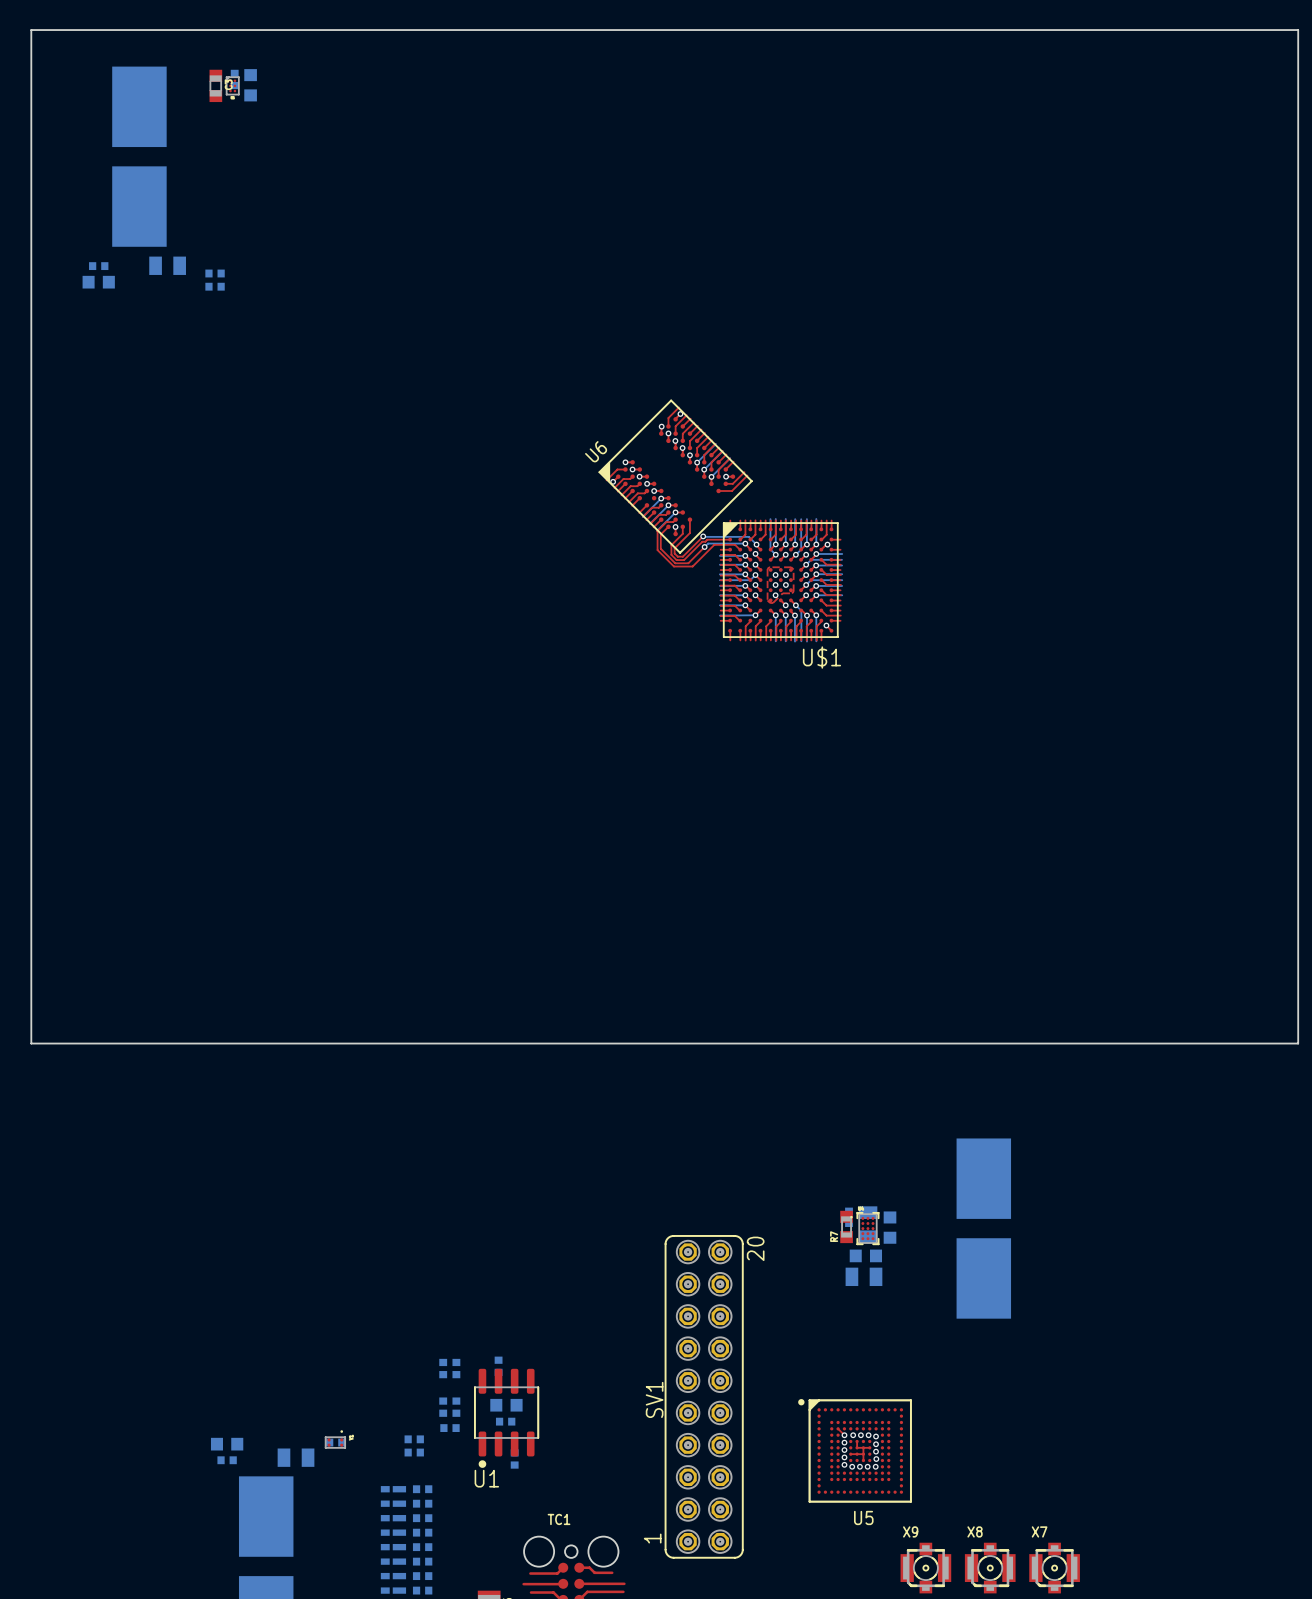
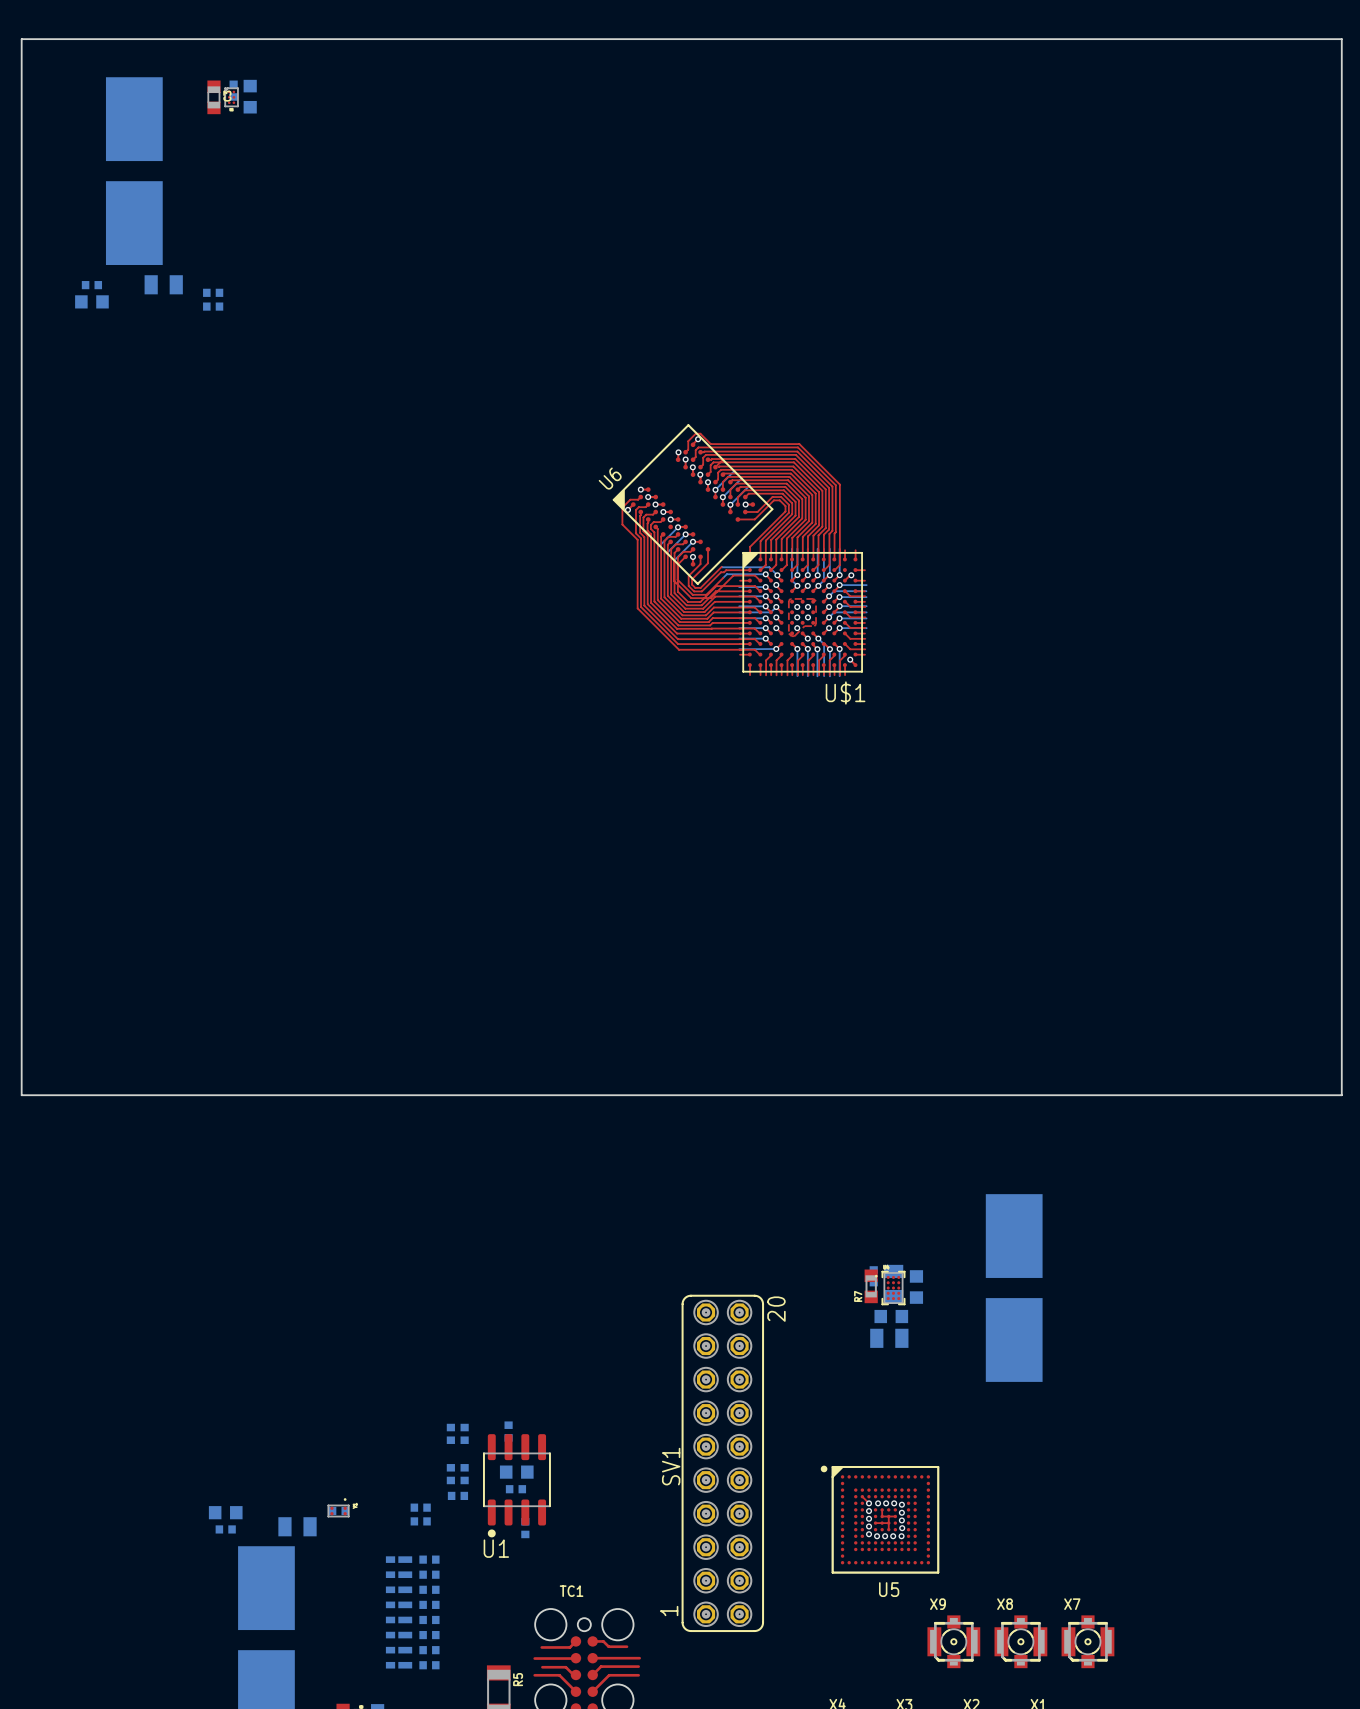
top track: (678, 407) (668, 418) (668, 426) -> (839, 550) (839, 484) (799, 444) (710, 444) (700, 433) (695, 433) (688, 441) (688, 449) (685, 452)
top track: (686, 415) (675, 426) (675, 433) -> (834, 550) (835, 485) (797, 447) (698, 447) (693, 459)
top track: (690, 418) (682, 426) -> (829, 550) (829, 533) (832, 530) (832, 486) (797, 451) (700, 452)
top track: (693, 422) (682, 433) (682, 440) -> (823, 550) (823, 534) (829, 529) (829, 488) (795, 454) (706, 454) (700, 467)
top track: (697, 425) (689, 433) -> (818, 550) (818, 535) (825, 528) (825, 489) (795, 459) (708, 459)
top track: (701, 429) (689, 441) (689, 448) -> (813, 550) (813, 535) (822, 526) (822, 490) (793, 462) (713, 462) (708, 474)
top track: (708, 436) (697, 448) (697, 455) -> (802, 550) (802, 536) (815, 523) (815, 493) (791, 469) (720, 469) (715, 482)
top track: none -> (718, 467) (793, 466) (819, 492) (819, 525) (807, 536) (807, 549)
top track: (711, 440) (705, 446) -> (797, 549) (797, 537) (812, 522) (812, 494) (790, 473) (724, 473)
top track: (715, 443) (709, 450) -> (792, 550) (792, 537) (808, 521) (808, 496) (789, 476) (727, 476)
top track: (719, 447) (713, 453) -> (786, 550) (786, 538) (805, 519) (805, 497) (788, 480) (732, 480)
top track: (722, 451) (717, 456) -> (781, 550) (781, 538) (802, 518) (802, 499) (786, 483) (736, 483)
top track: (726, 454) (721, 459) -> (776, 550) (776, 539) (798, 516) (798, 500) (785, 486) (740, 486)
top track: (729, 458) (725, 463) -> (771, 550) (771, 540) (795, 515) (795, 501) (783, 490) (744, 490)
top track: (733, 461) (729, 466) -> (765, 550) (765, 540) (792, 514) (792, 503) (782, 493) (748, 493)
top track: (625, 469) (617, 469) (606, 480) -> (640, 497) (638, 499) (630, 499) (622, 507) (622, 524) (637, 539) (637, 608) (678, 649) (739, 649)
top track: (744, 472) (732, 483) -> (760, 550) (760, 541) (788, 512) (788, 504) (781, 497) (772, 497) (757, 512) (752, 512)
top track: (747, 475) (731, 491) -> (750, 550) (750, 546) (785, 511) (785, 506) (779, 500) (773, 500) (754, 519) (751, 519)
top track: (630, 479) (623, 479) (614, 488) -> (645, 507) (638, 507) (635, 510) (635, 533) (641, 538) (641, 607) (678, 644) (740, 644)
top track: (625, 483) (617, 491) -> (640, 512) (640, 532) (644, 537) (644, 605) (677, 639) (740, 639)
top track: (637, 486) (630, 486) (621, 495) -> (653, 514) (646, 514) (643, 517) (643, 531) (647, 535) (647, 604) (677, 633) (740, 633)
top track: (632, 491) (624, 498) -> (648, 519) (647, 530) (651, 534) (651, 602) (677, 628) (739, 628)
top track: (644, 493) (637, 493) (628, 502) -> (660, 522) (653, 522) (650, 524) (650, 528) (654, 532) (654, 601) (678, 625) (740, 622)
top track: (639, 498) (632, 505) -> (655, 526) (657, 528) (657, 600) (679, 622) (708, 622) (712, 618) (739, 618)
top track: (644, 507) (639, 513) -> (661, 536) (661, 598) (681, 618) (707, 618) (713, 612) (740, 612)
top track: (648, 511) (643, 516) -> (664, 541) (664, 597) (682, 615) (705, 615) (713, 607) (740, 607)
top track: (651, 515) (646, 520) -> (667, 544) (667, 595) (683, 612) (704, 612) (714, 601) (740, 601)
top track: (654, 519) (650, 523) -> (671, 549) (671, 594) (685, 608) (703, 608) (715, 596) (740, 596)
top track: (826, 520) (826, 534) (821, 539) -> none
top track: (657, 523) (653, 527) -> (674, 552) (674, 593) (686, 605) (701, 605) (715, 591) (740, 591)
top track: (661, 527) (657, 531) -> (677, 557) (677, 591) (688, 601) (700, 601) (716, 586) (740, 586)
via: (703, 536) -> none
via: (704, 547) -> none

